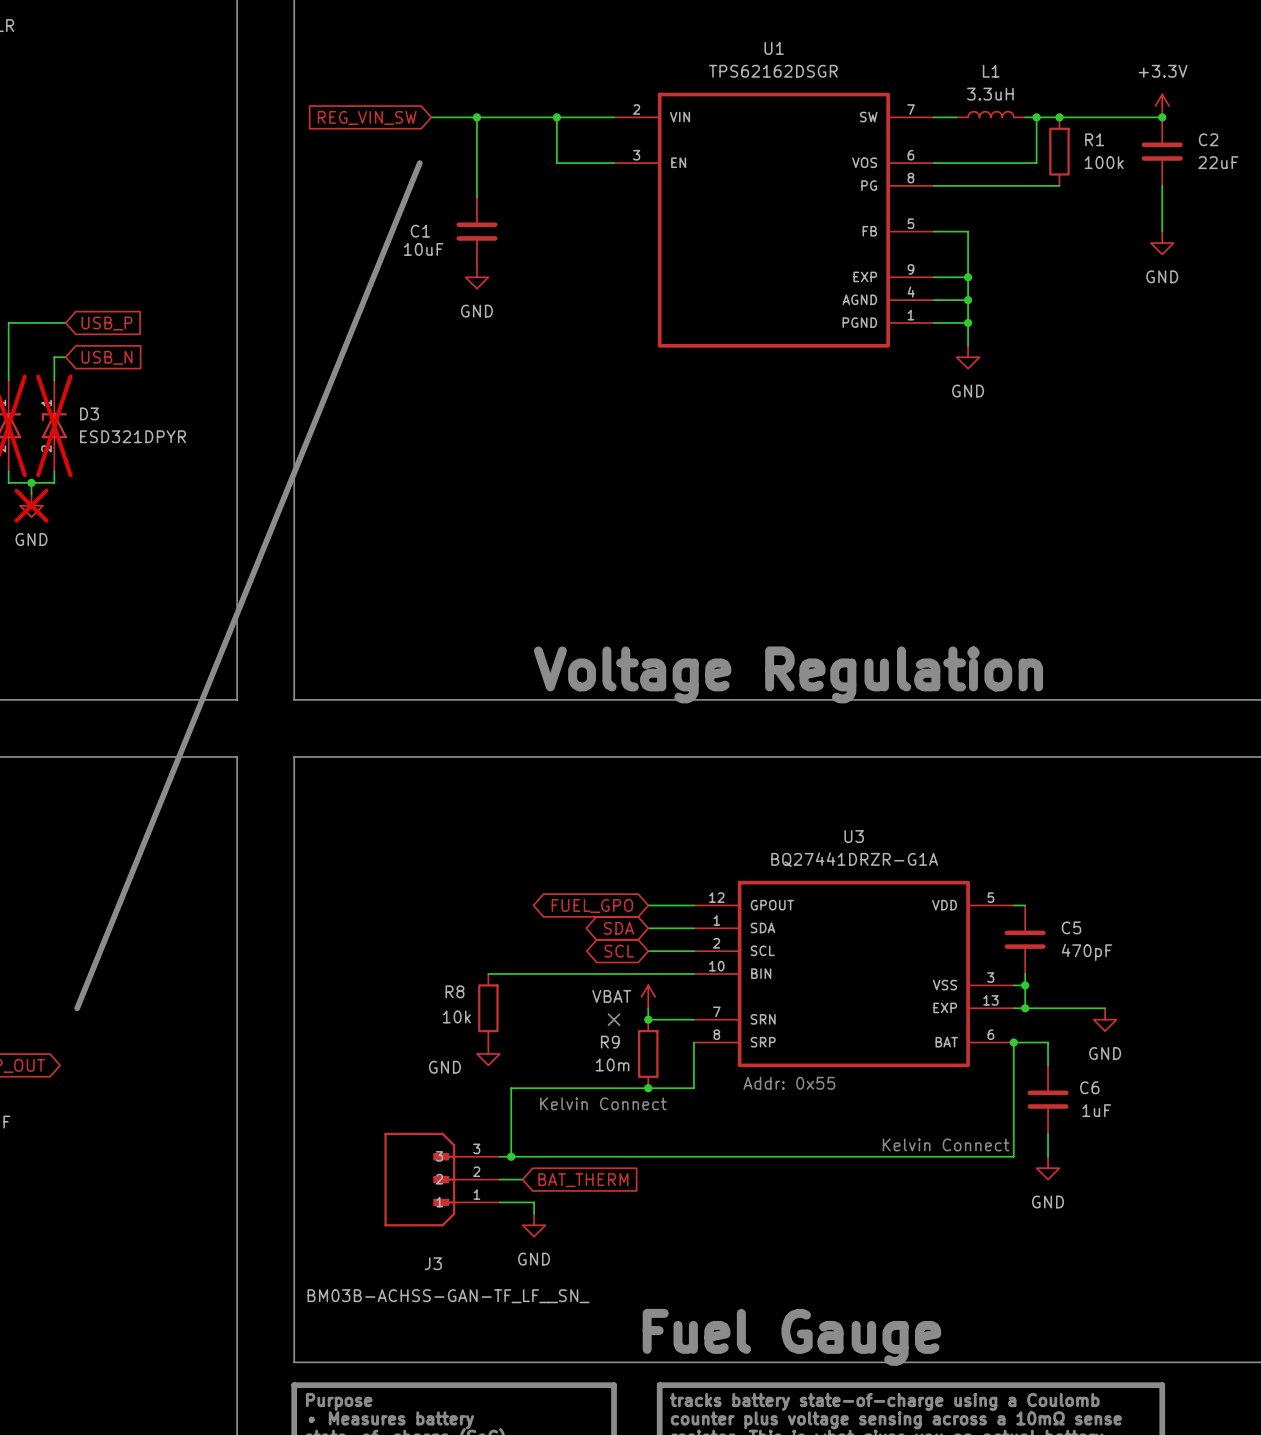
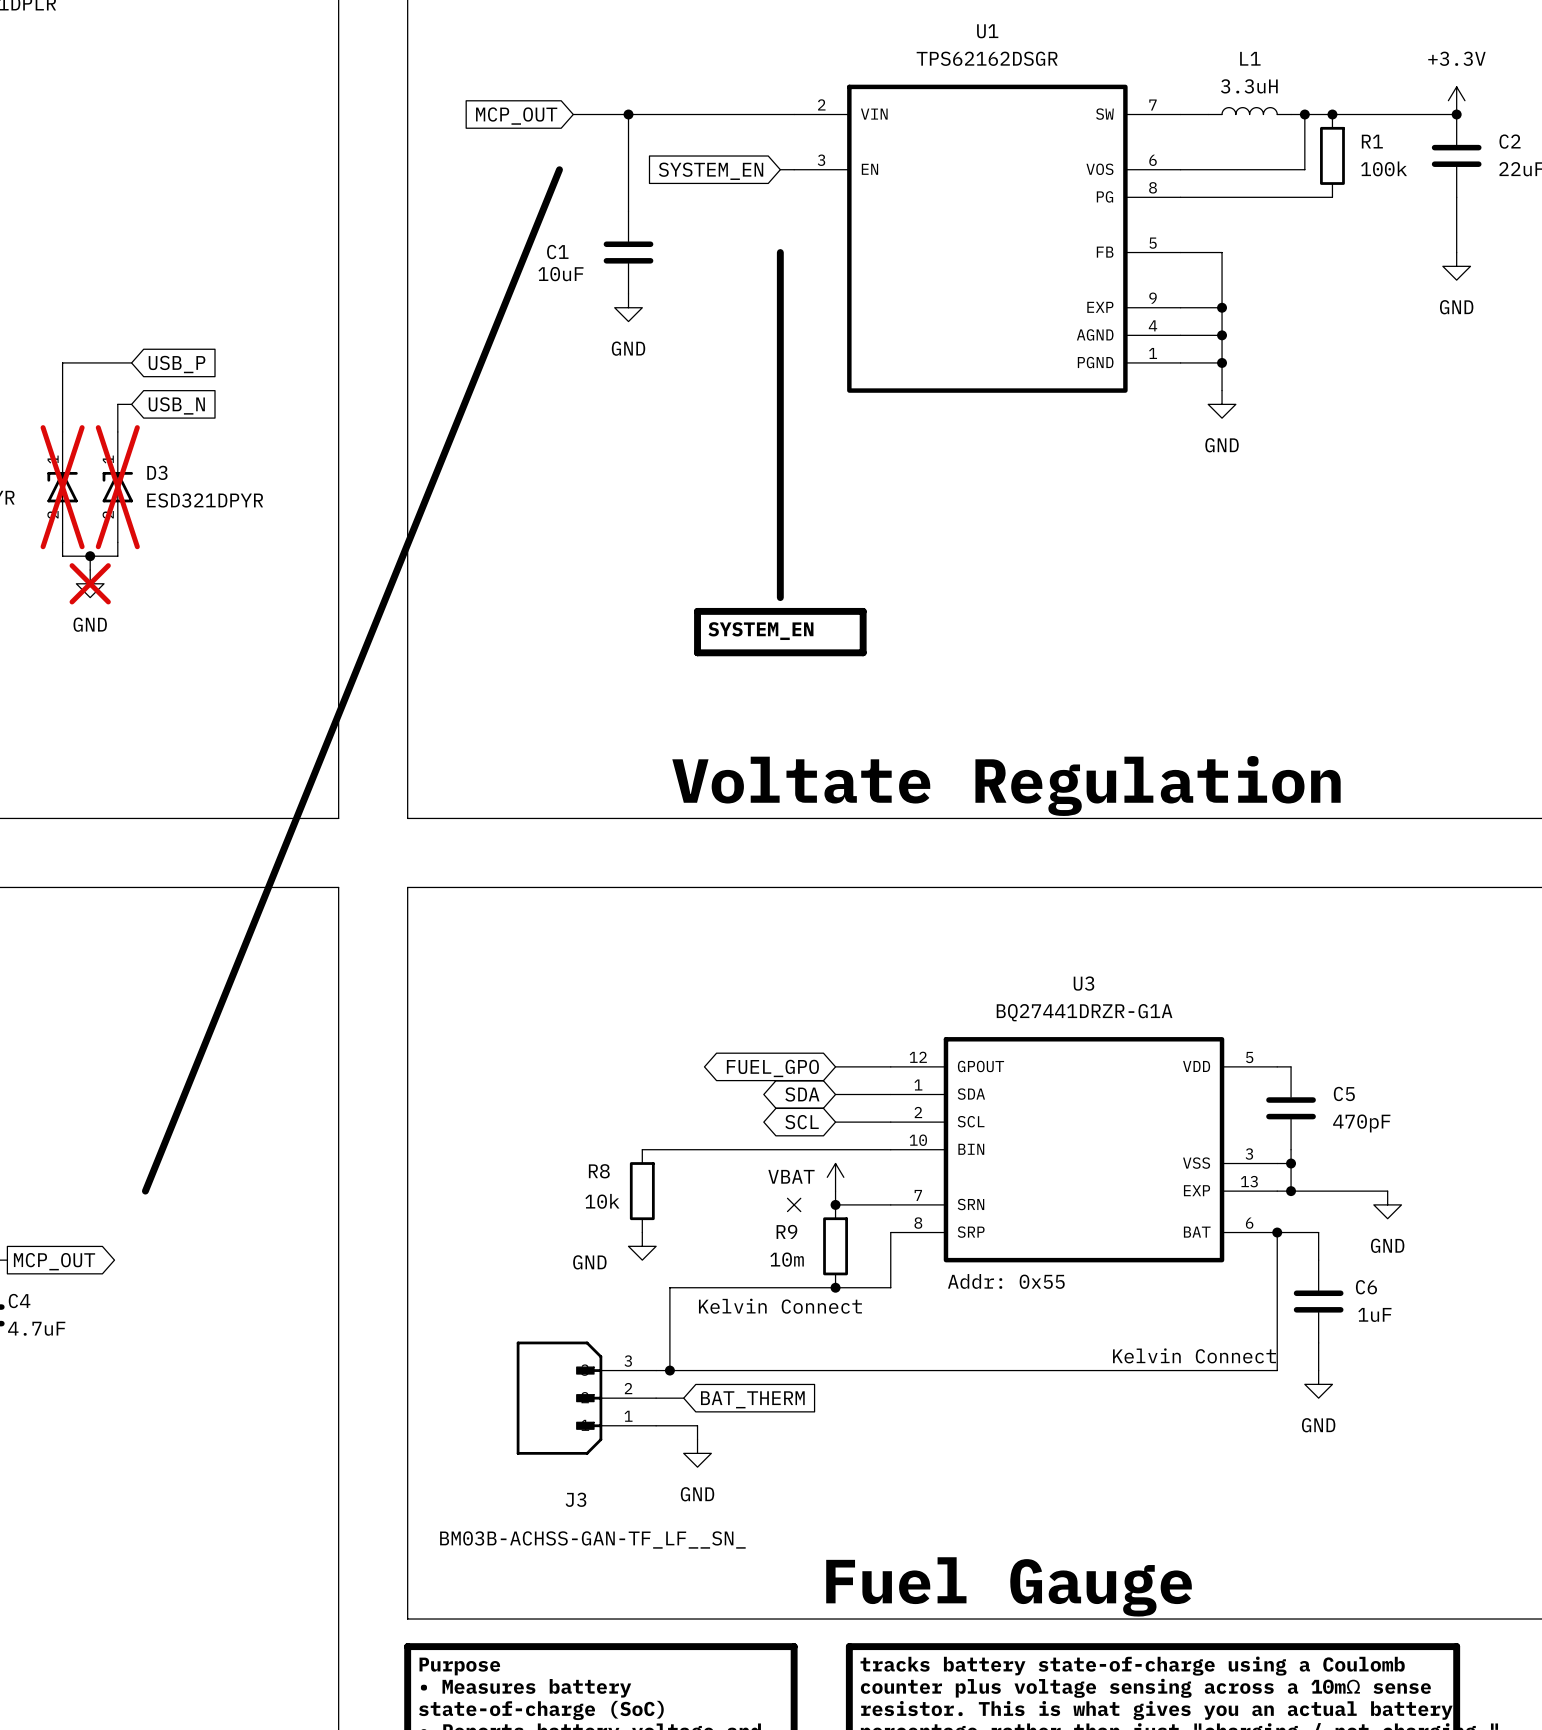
global label: REG_VIN_SW (367, 117) -> MCP_OUT (516, 116)
wire: (556, 117) (556, 163) (602, 163) -> none
junction: (556, 117) -> none
global label: none -> SYSTEM_EN (711, 171)
line: none -> (780, 252) (780, 597)
line: none -> (697, 611) (863, 611) (863, 652) (697, 652) (697, 611)
text: none -> SYSTEM_EN (760, 631)
text: Voltage Regulation (788, 674) -> Voltate Regulation (1006, 785)

